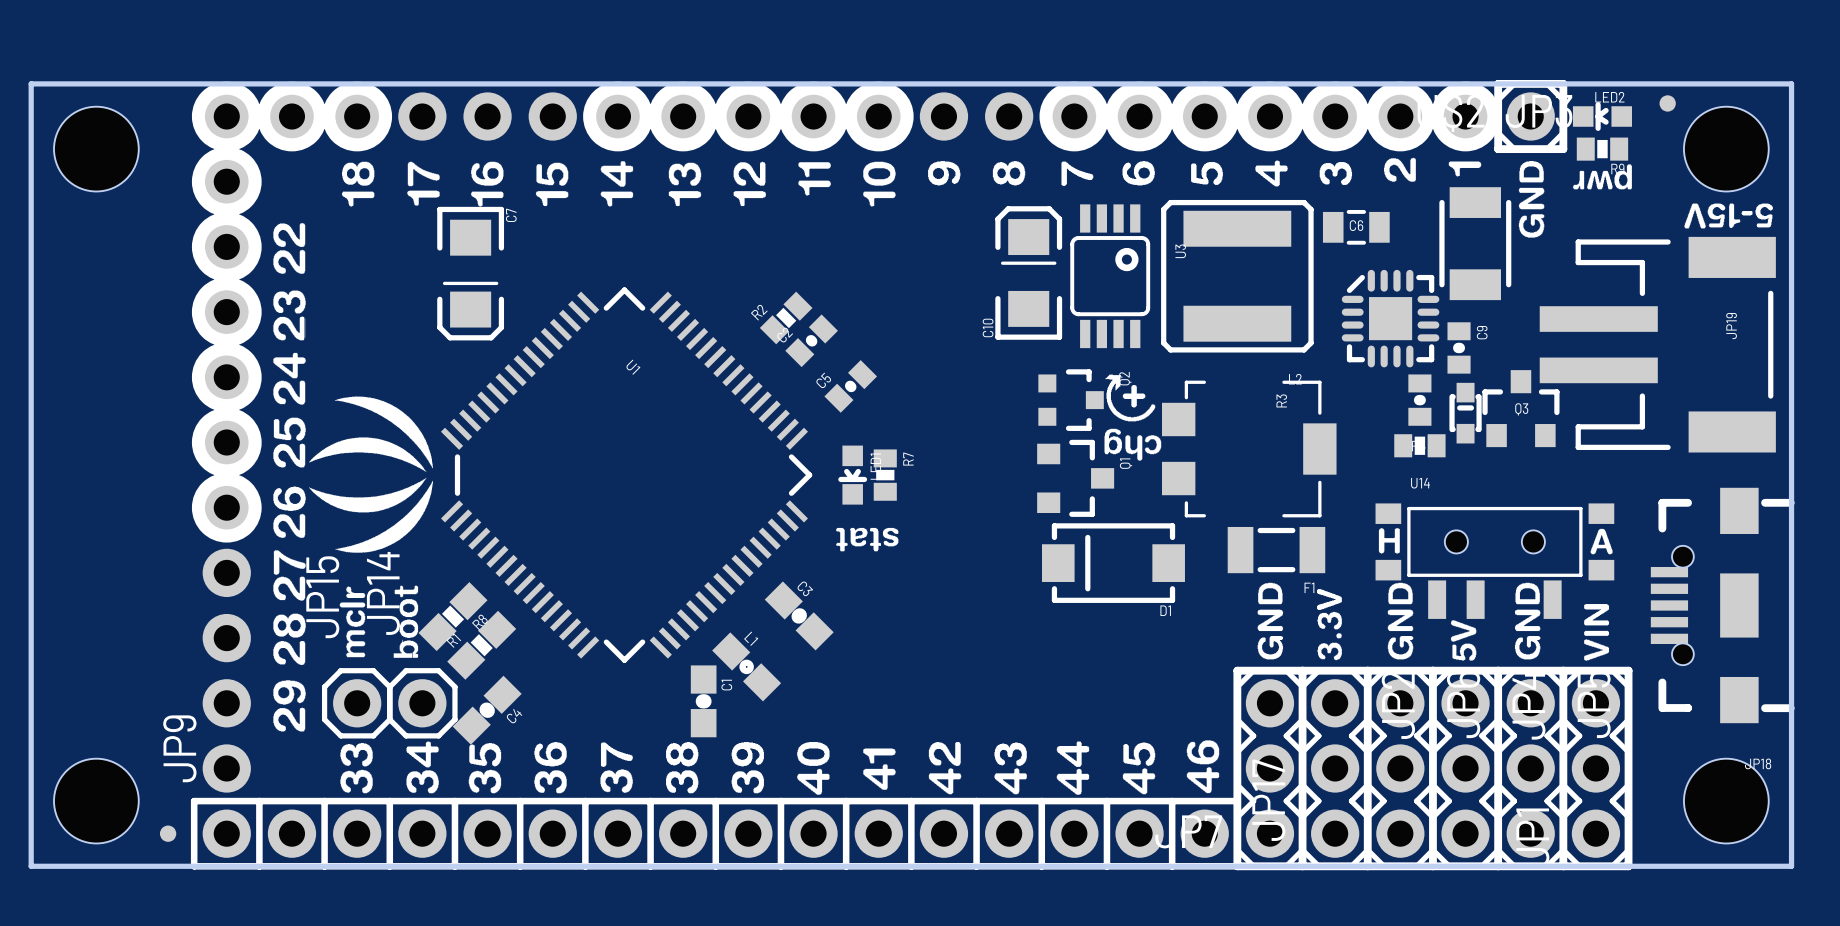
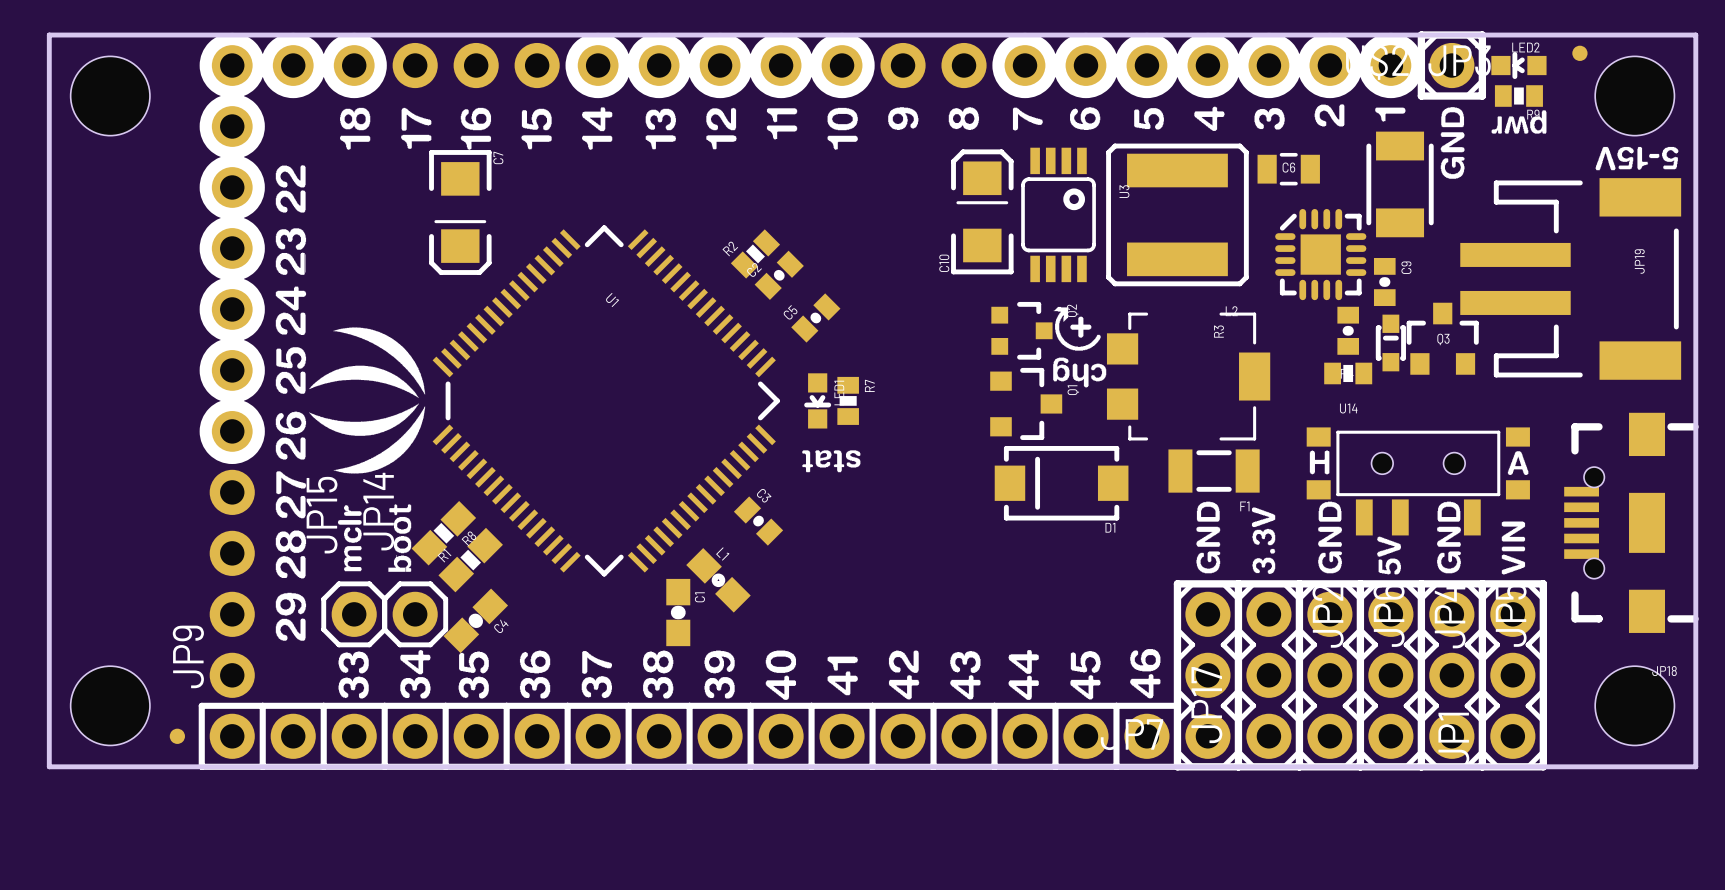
C3 footprint: [764, 581, 834, 651] -> [733, 496, 784, 546]

